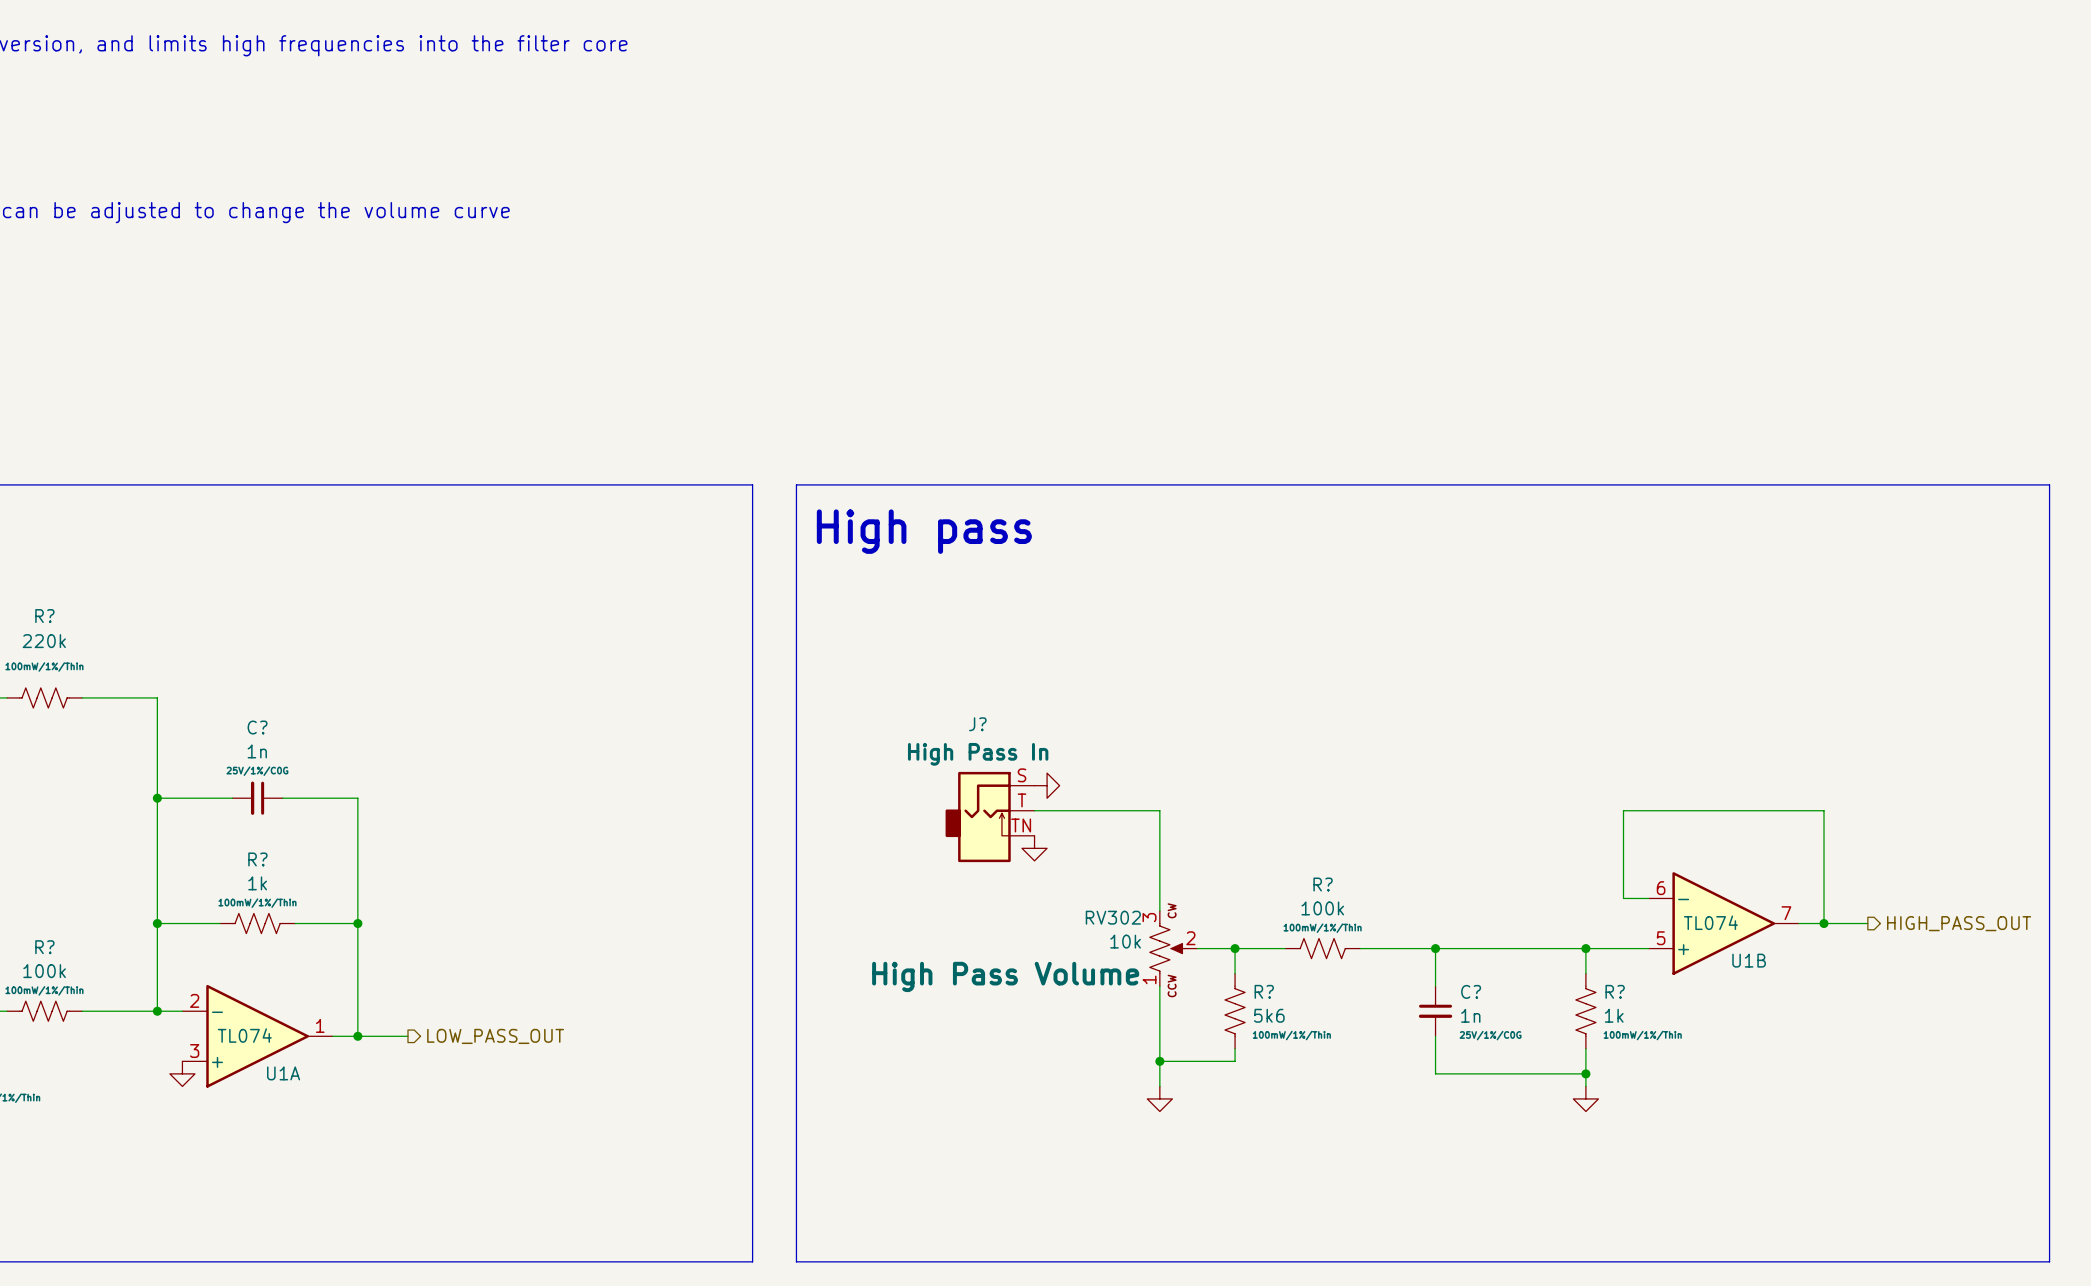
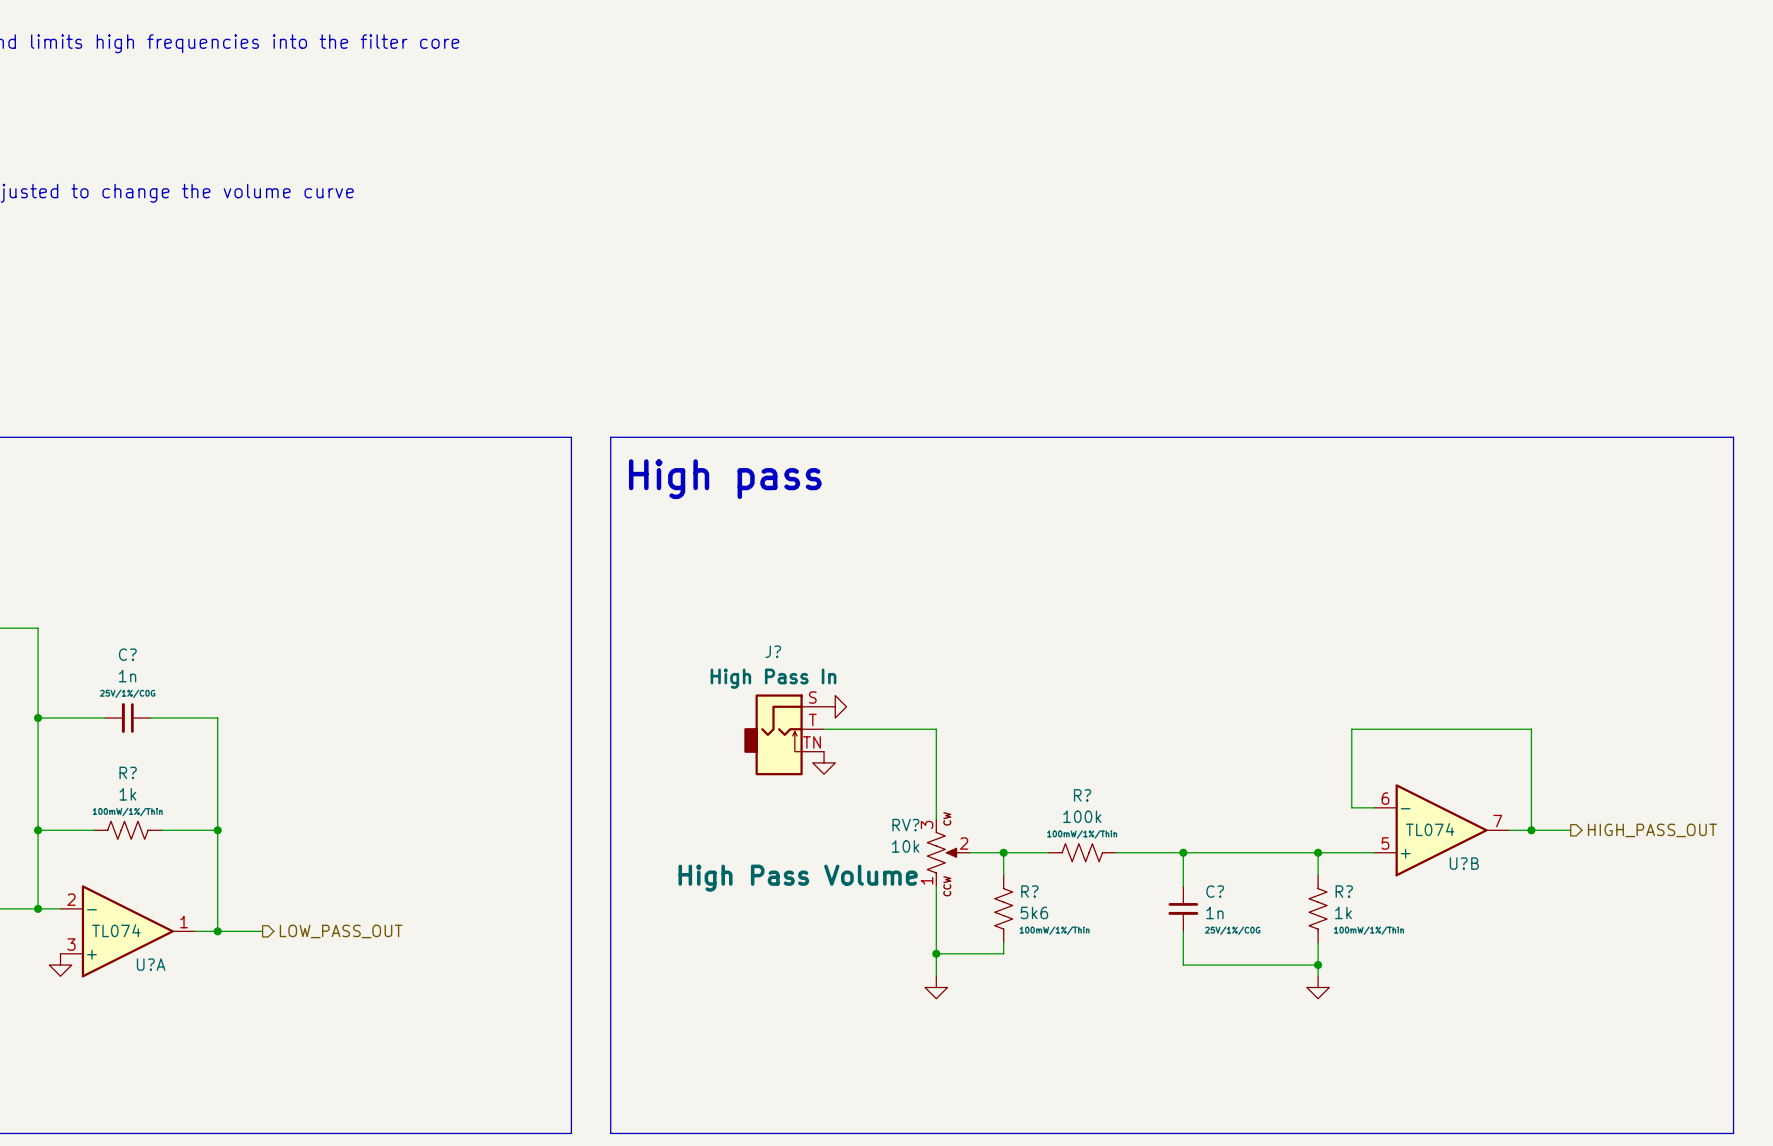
RV302 name: RV302 (1113, 917) -> RV? (905, 825)
U1B name: U1B (1749, 960) -> U?B (1464, 863)
U1A name: U1A (283, 1073) -> U?A (151, 964)

